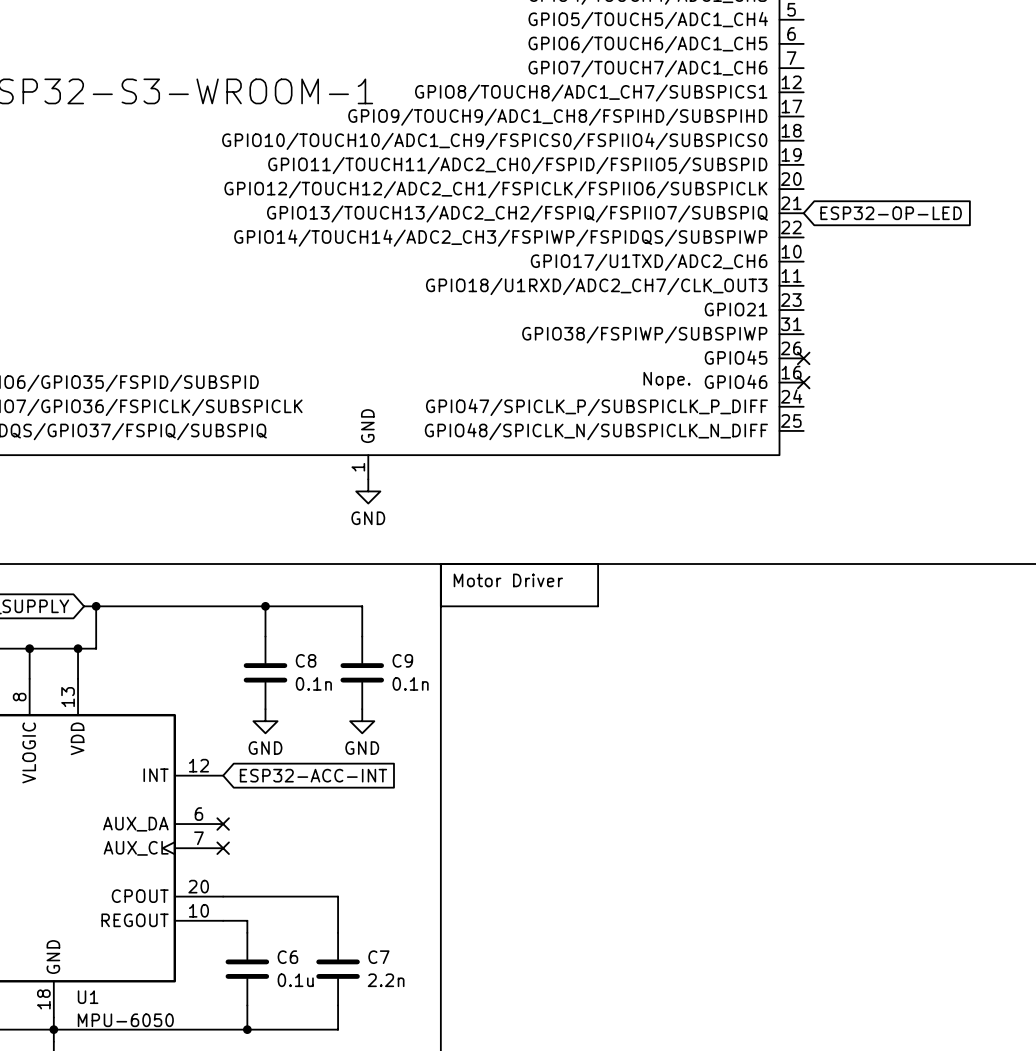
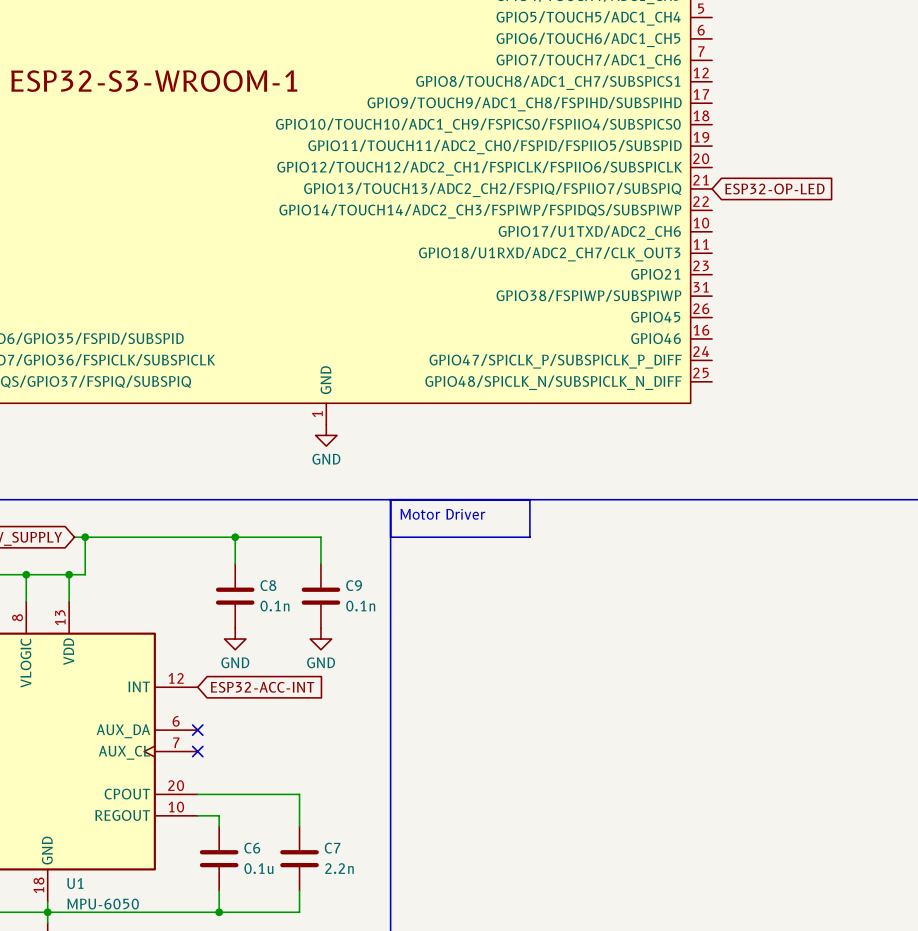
no-connect mark: (803, 358) -> none
text: Nope. (667, 380) -> none
no-connect mark: (803, 382) -> none

